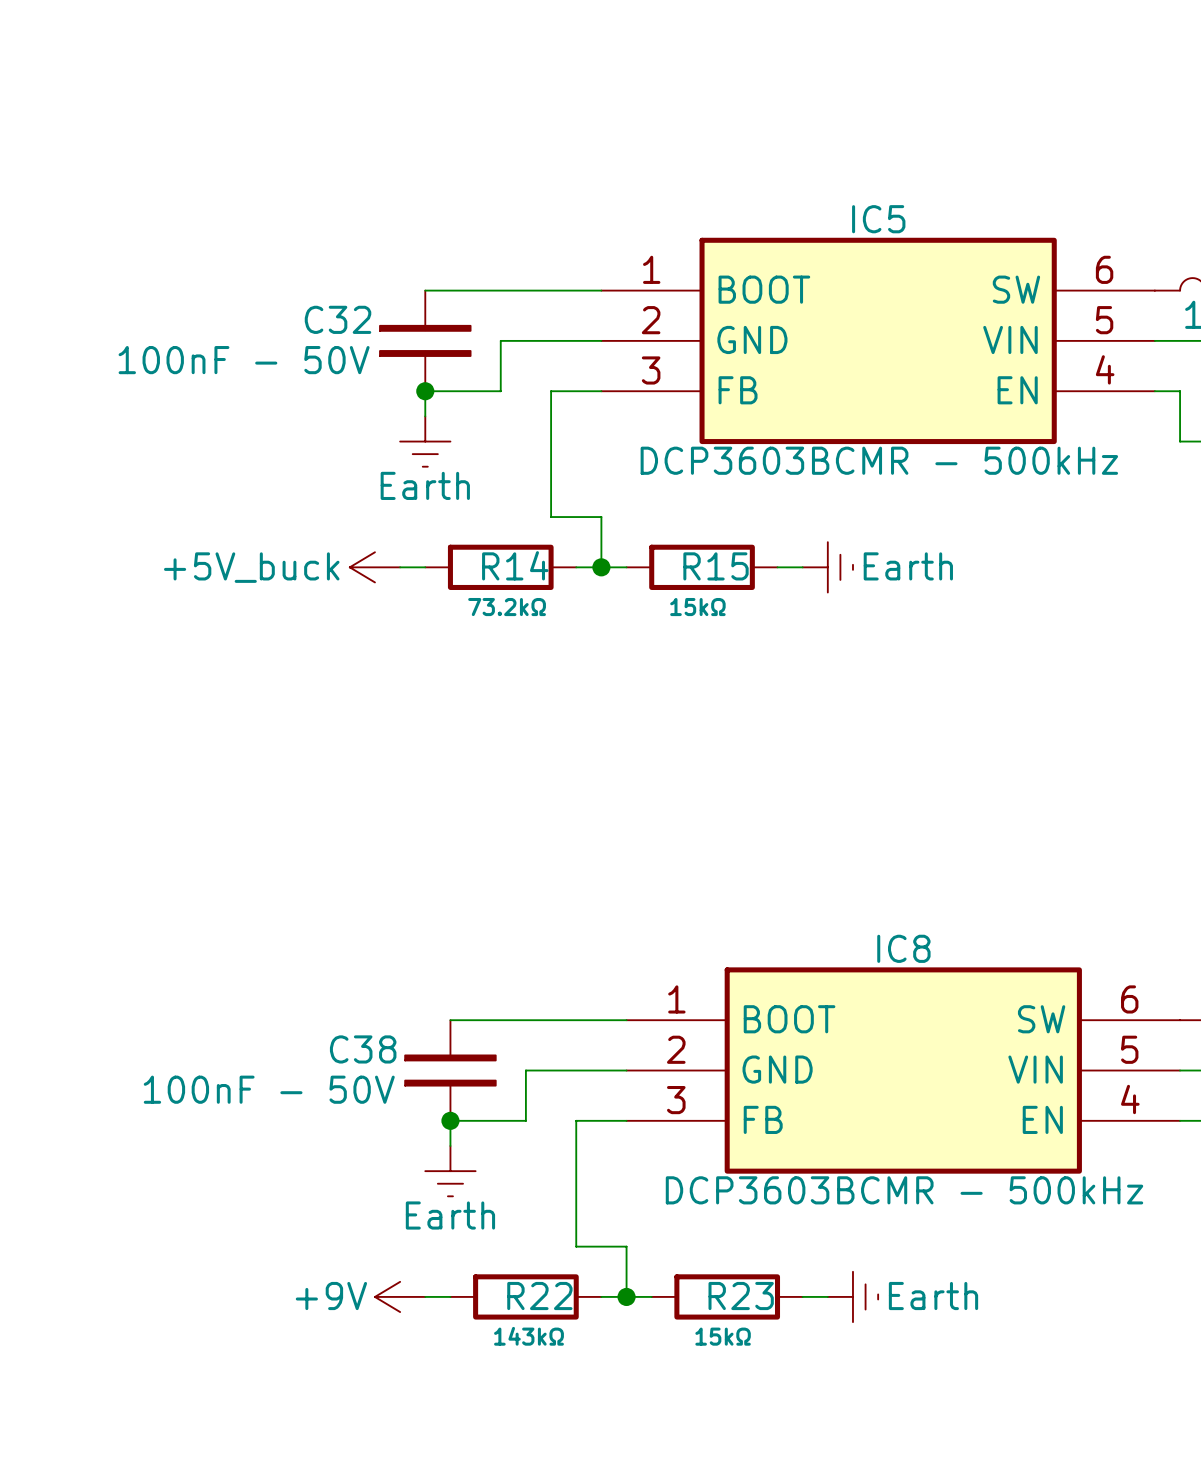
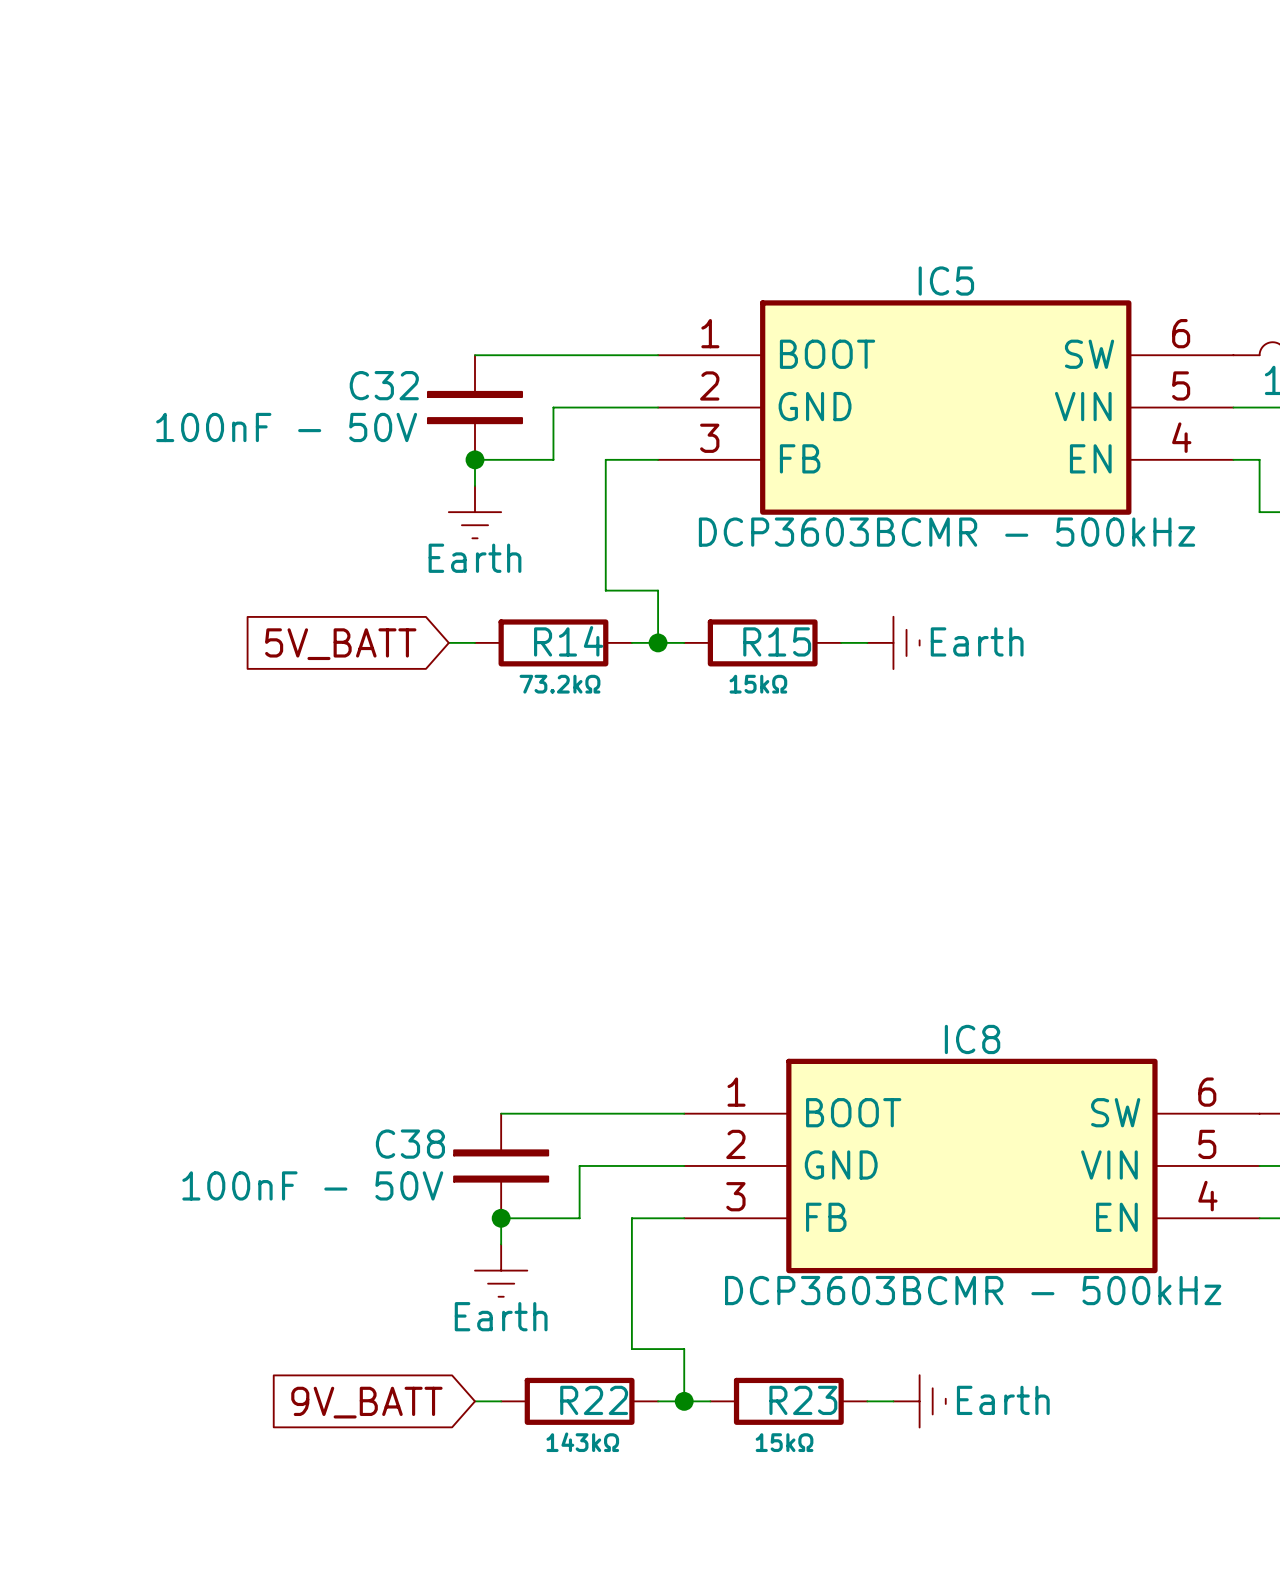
power symbol: +5V_buck (374, 567) -> none
global label: none -> 5V_BATT (340, 644)
power symbol: +9V (400, 1296) -> none
global label: none -> 9V_BATT (366, 1402)

